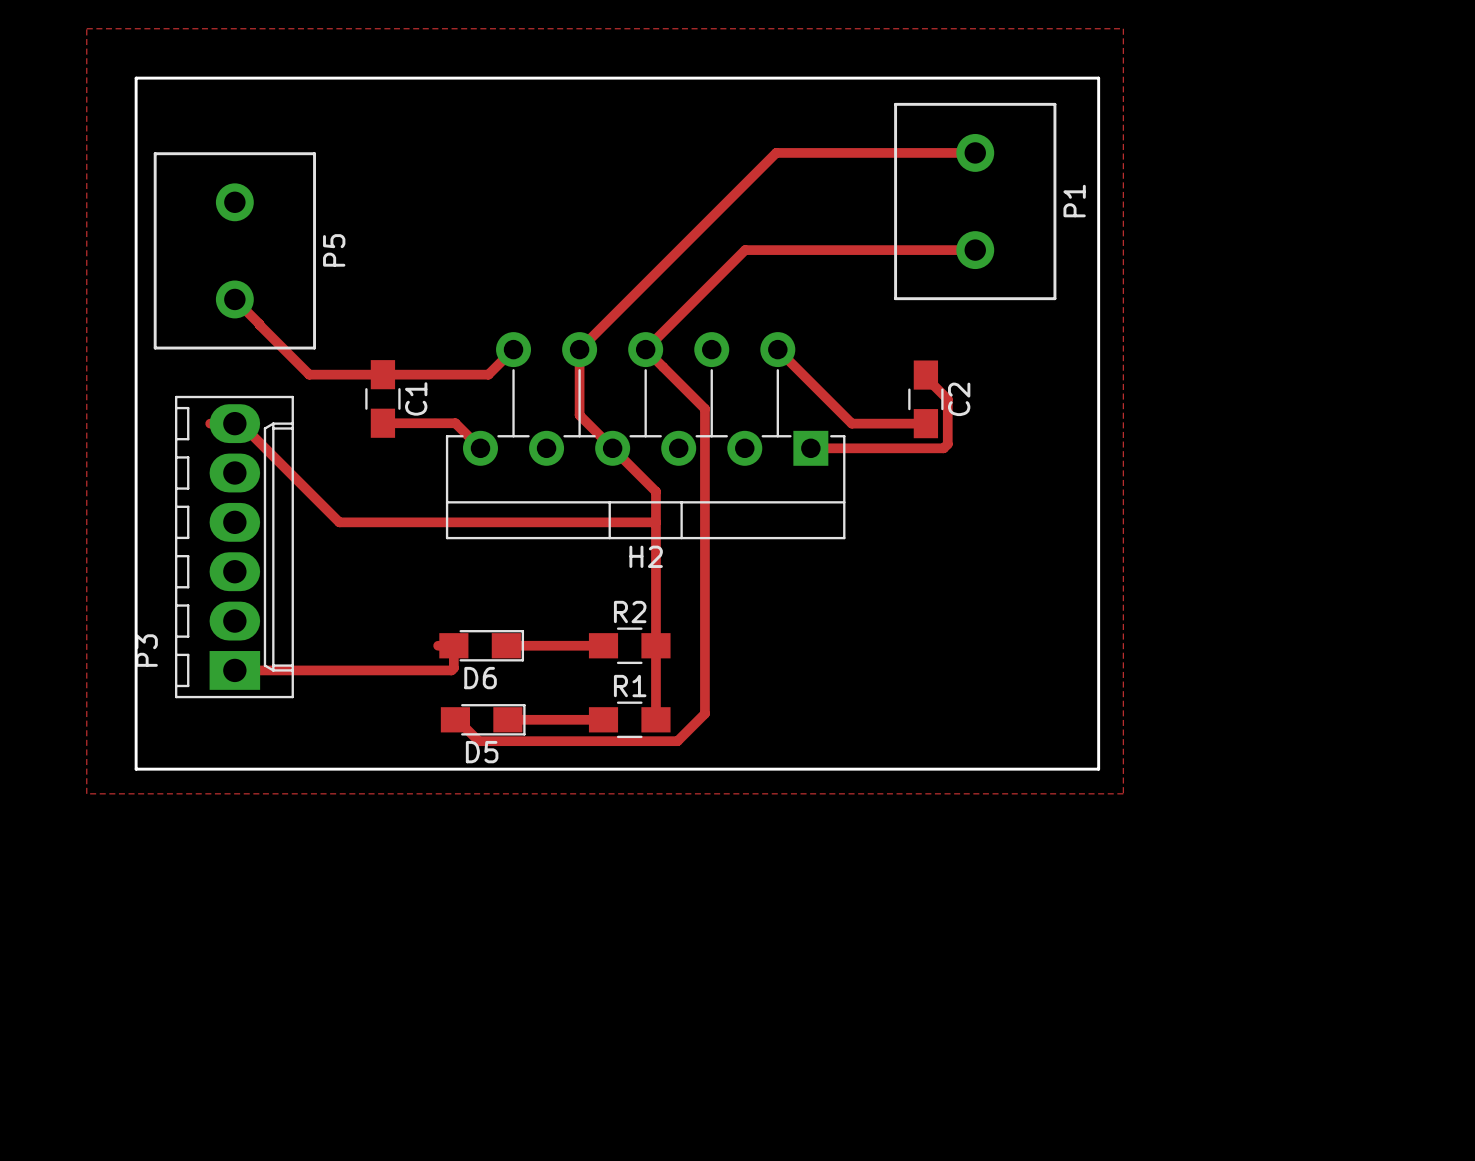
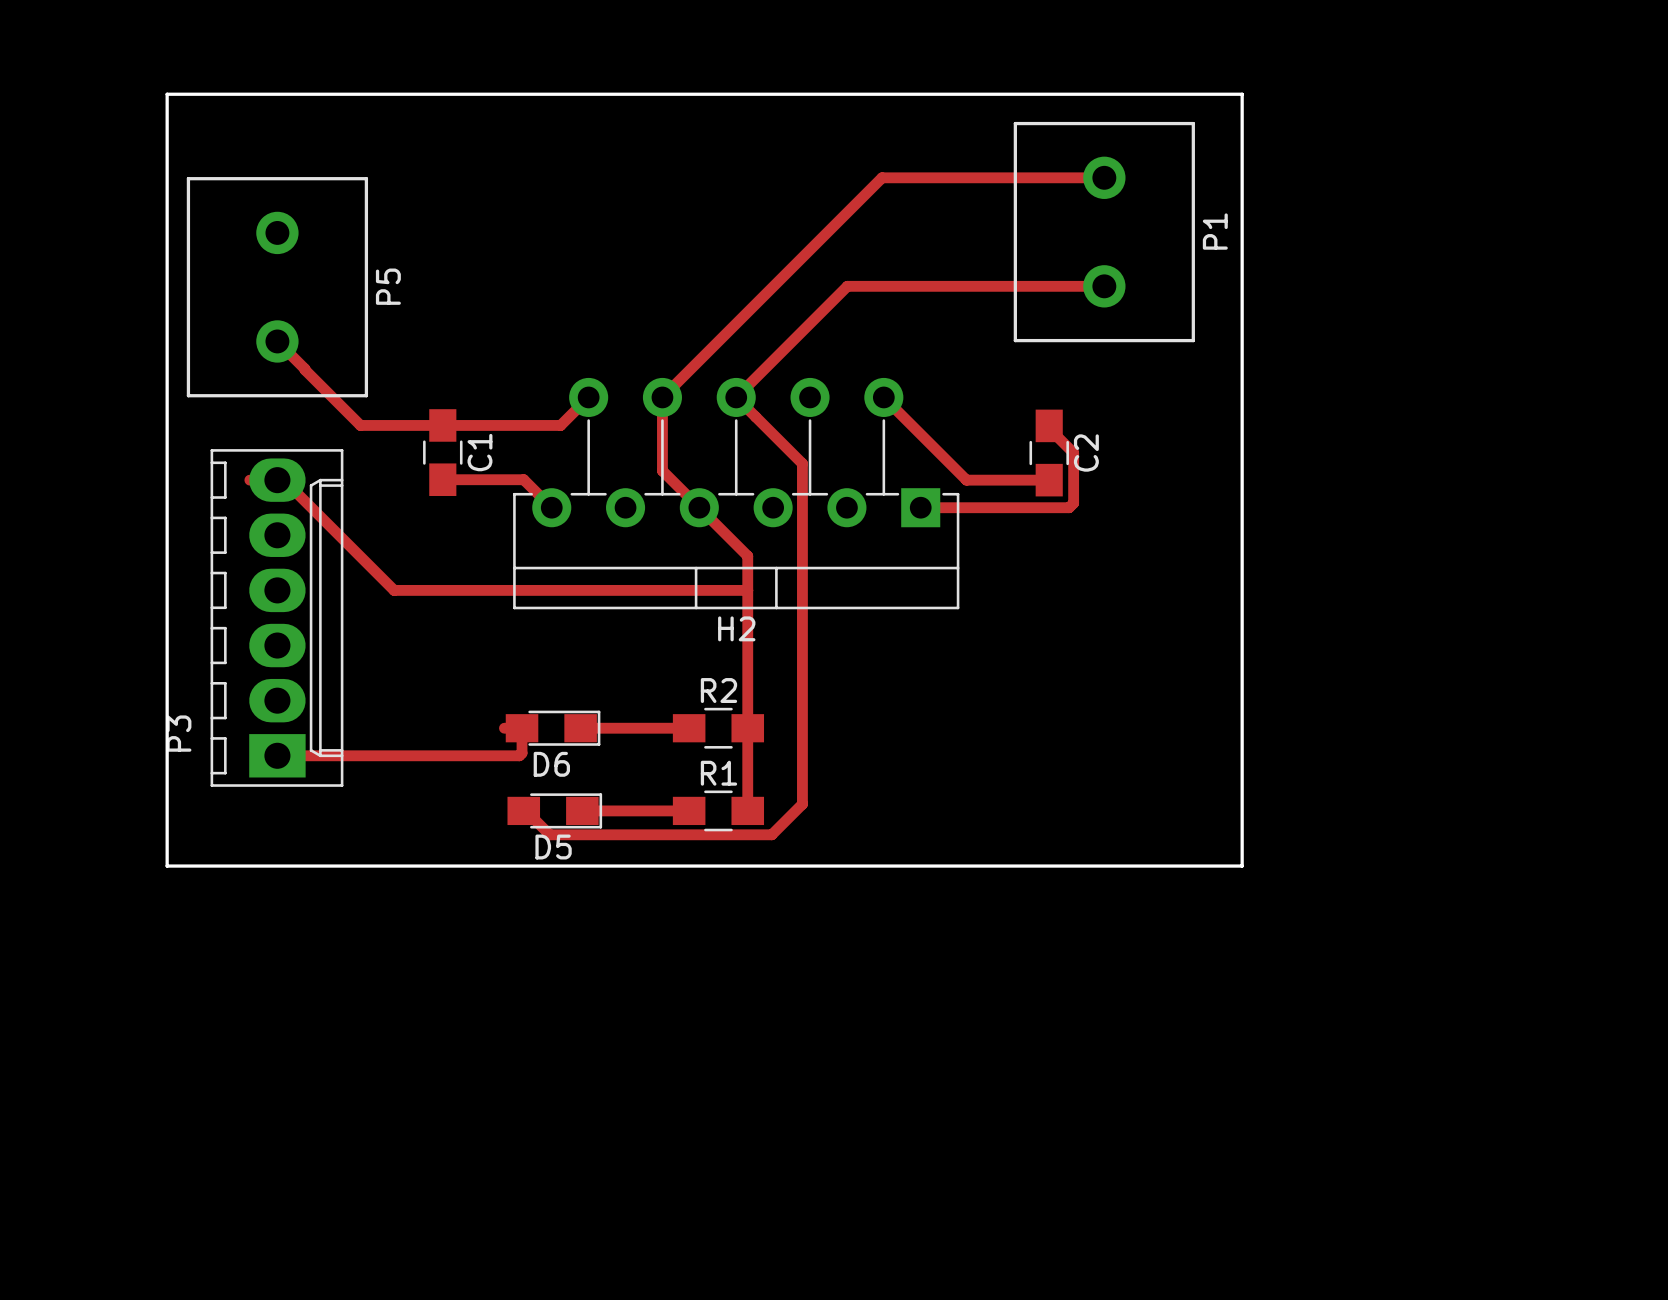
zone outline: (86, 28) (1123, 28) (1123, 793) (86, 793) (86, 28) -> none

